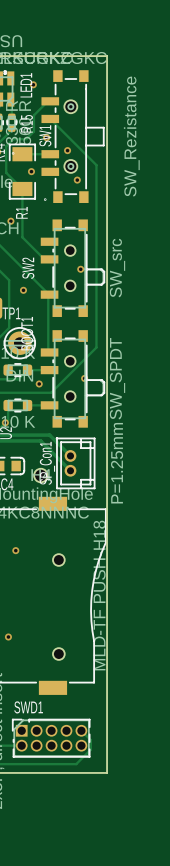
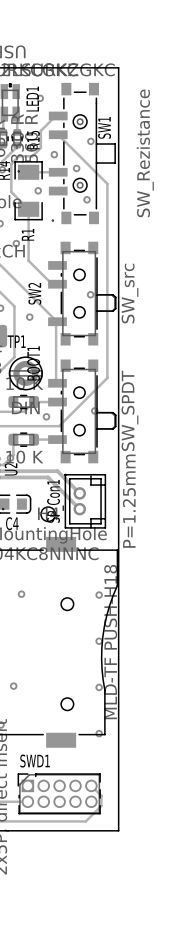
via: none -> (90, 141)
SW1 name position: SW1 (45, 135) -> SW1 (104, 127)
via: none -> (99, 595)
via: none -> (99, 641)
via: none -> (99, 687)
via: none -> (99, 733)

